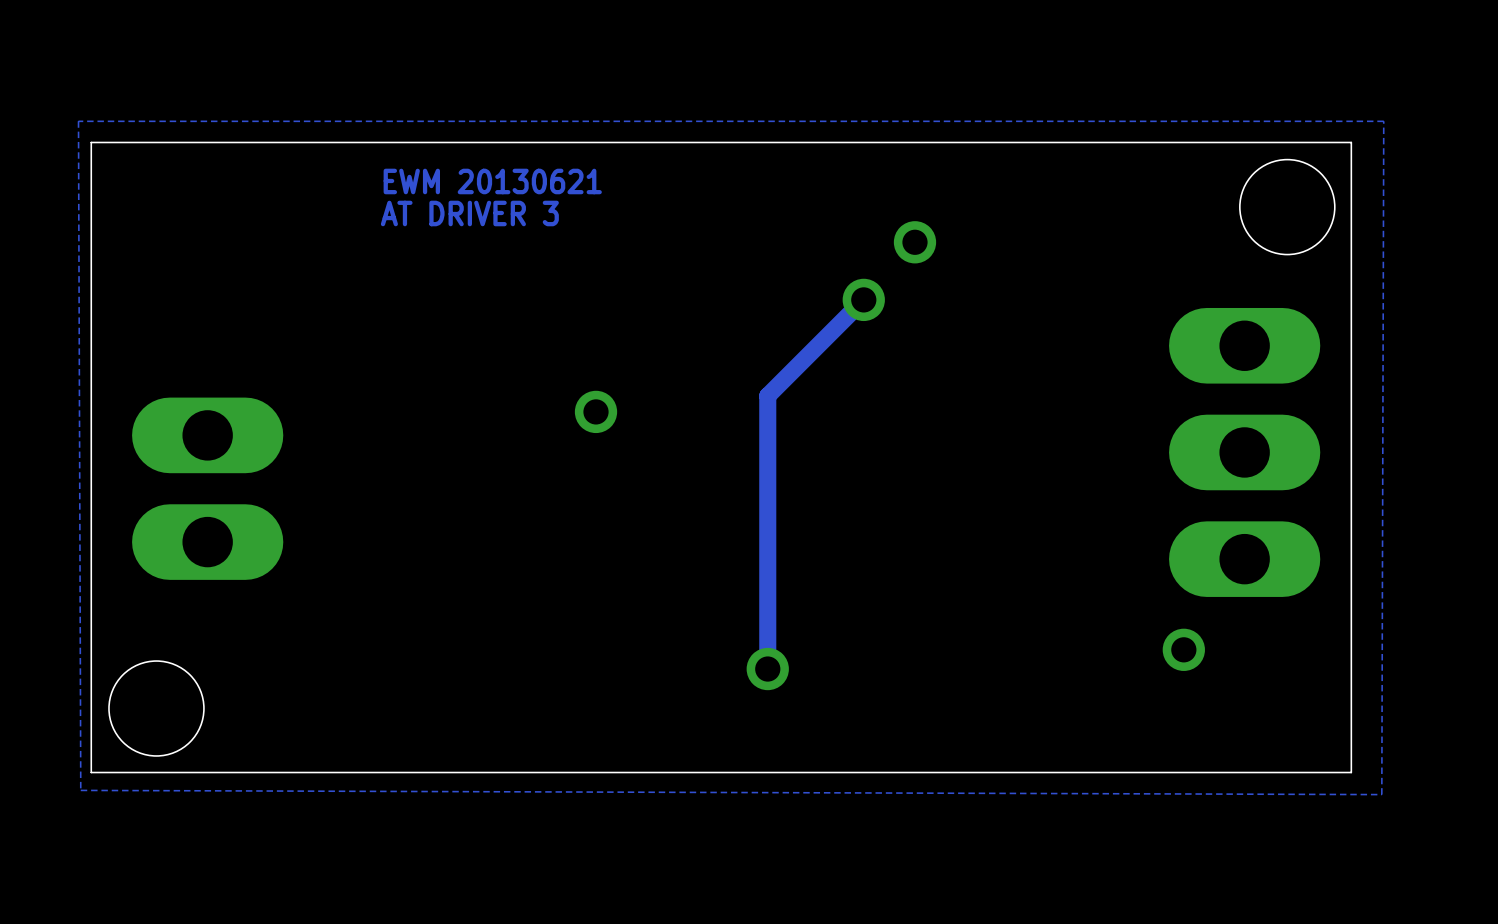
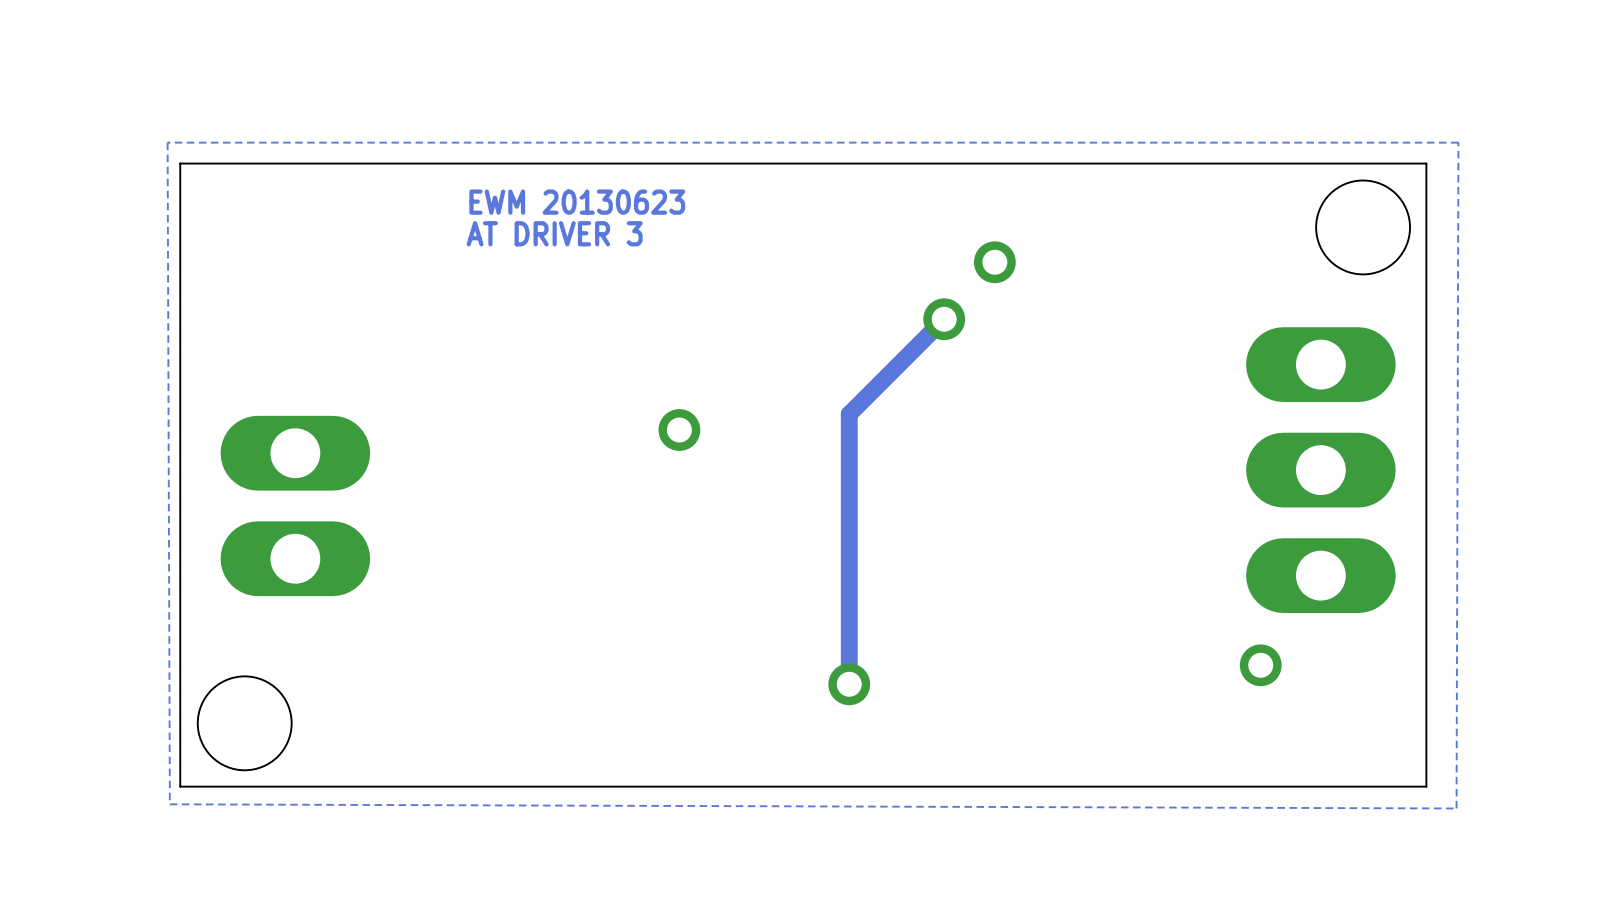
text: EWM 20130621 (492, 181) -> EWM 20130623 (577, 202)

